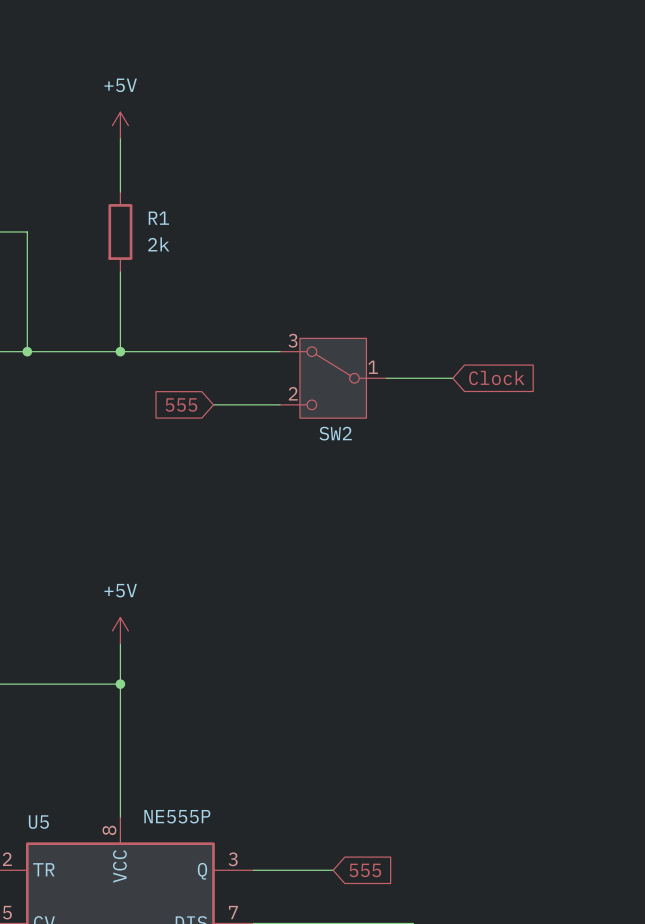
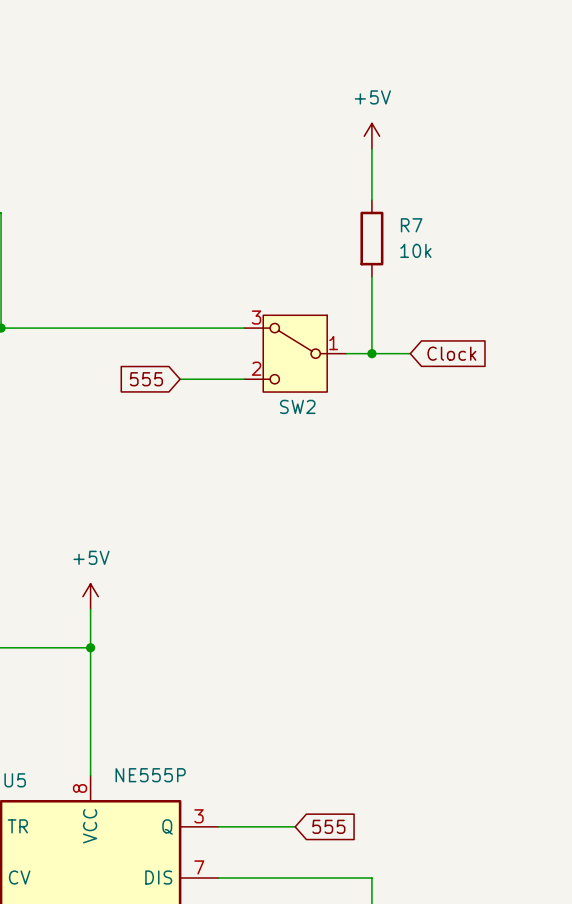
power symbol: +5V (120, 125) -> none
wire: (120, 138) (120, 192) -> none
power symbol: none -> +5V (371, 136)
wire: none -> (371, 149) (371, 200)
R1: 2k (120, 231) -> none
R7: none -> 10k (371, 238)
wire: (120, 271) (120, 351) -> none
wire: none -> (371, 276) (371, 353)
junction: (120, 351) -> none
junction: none -> (371, 353)

